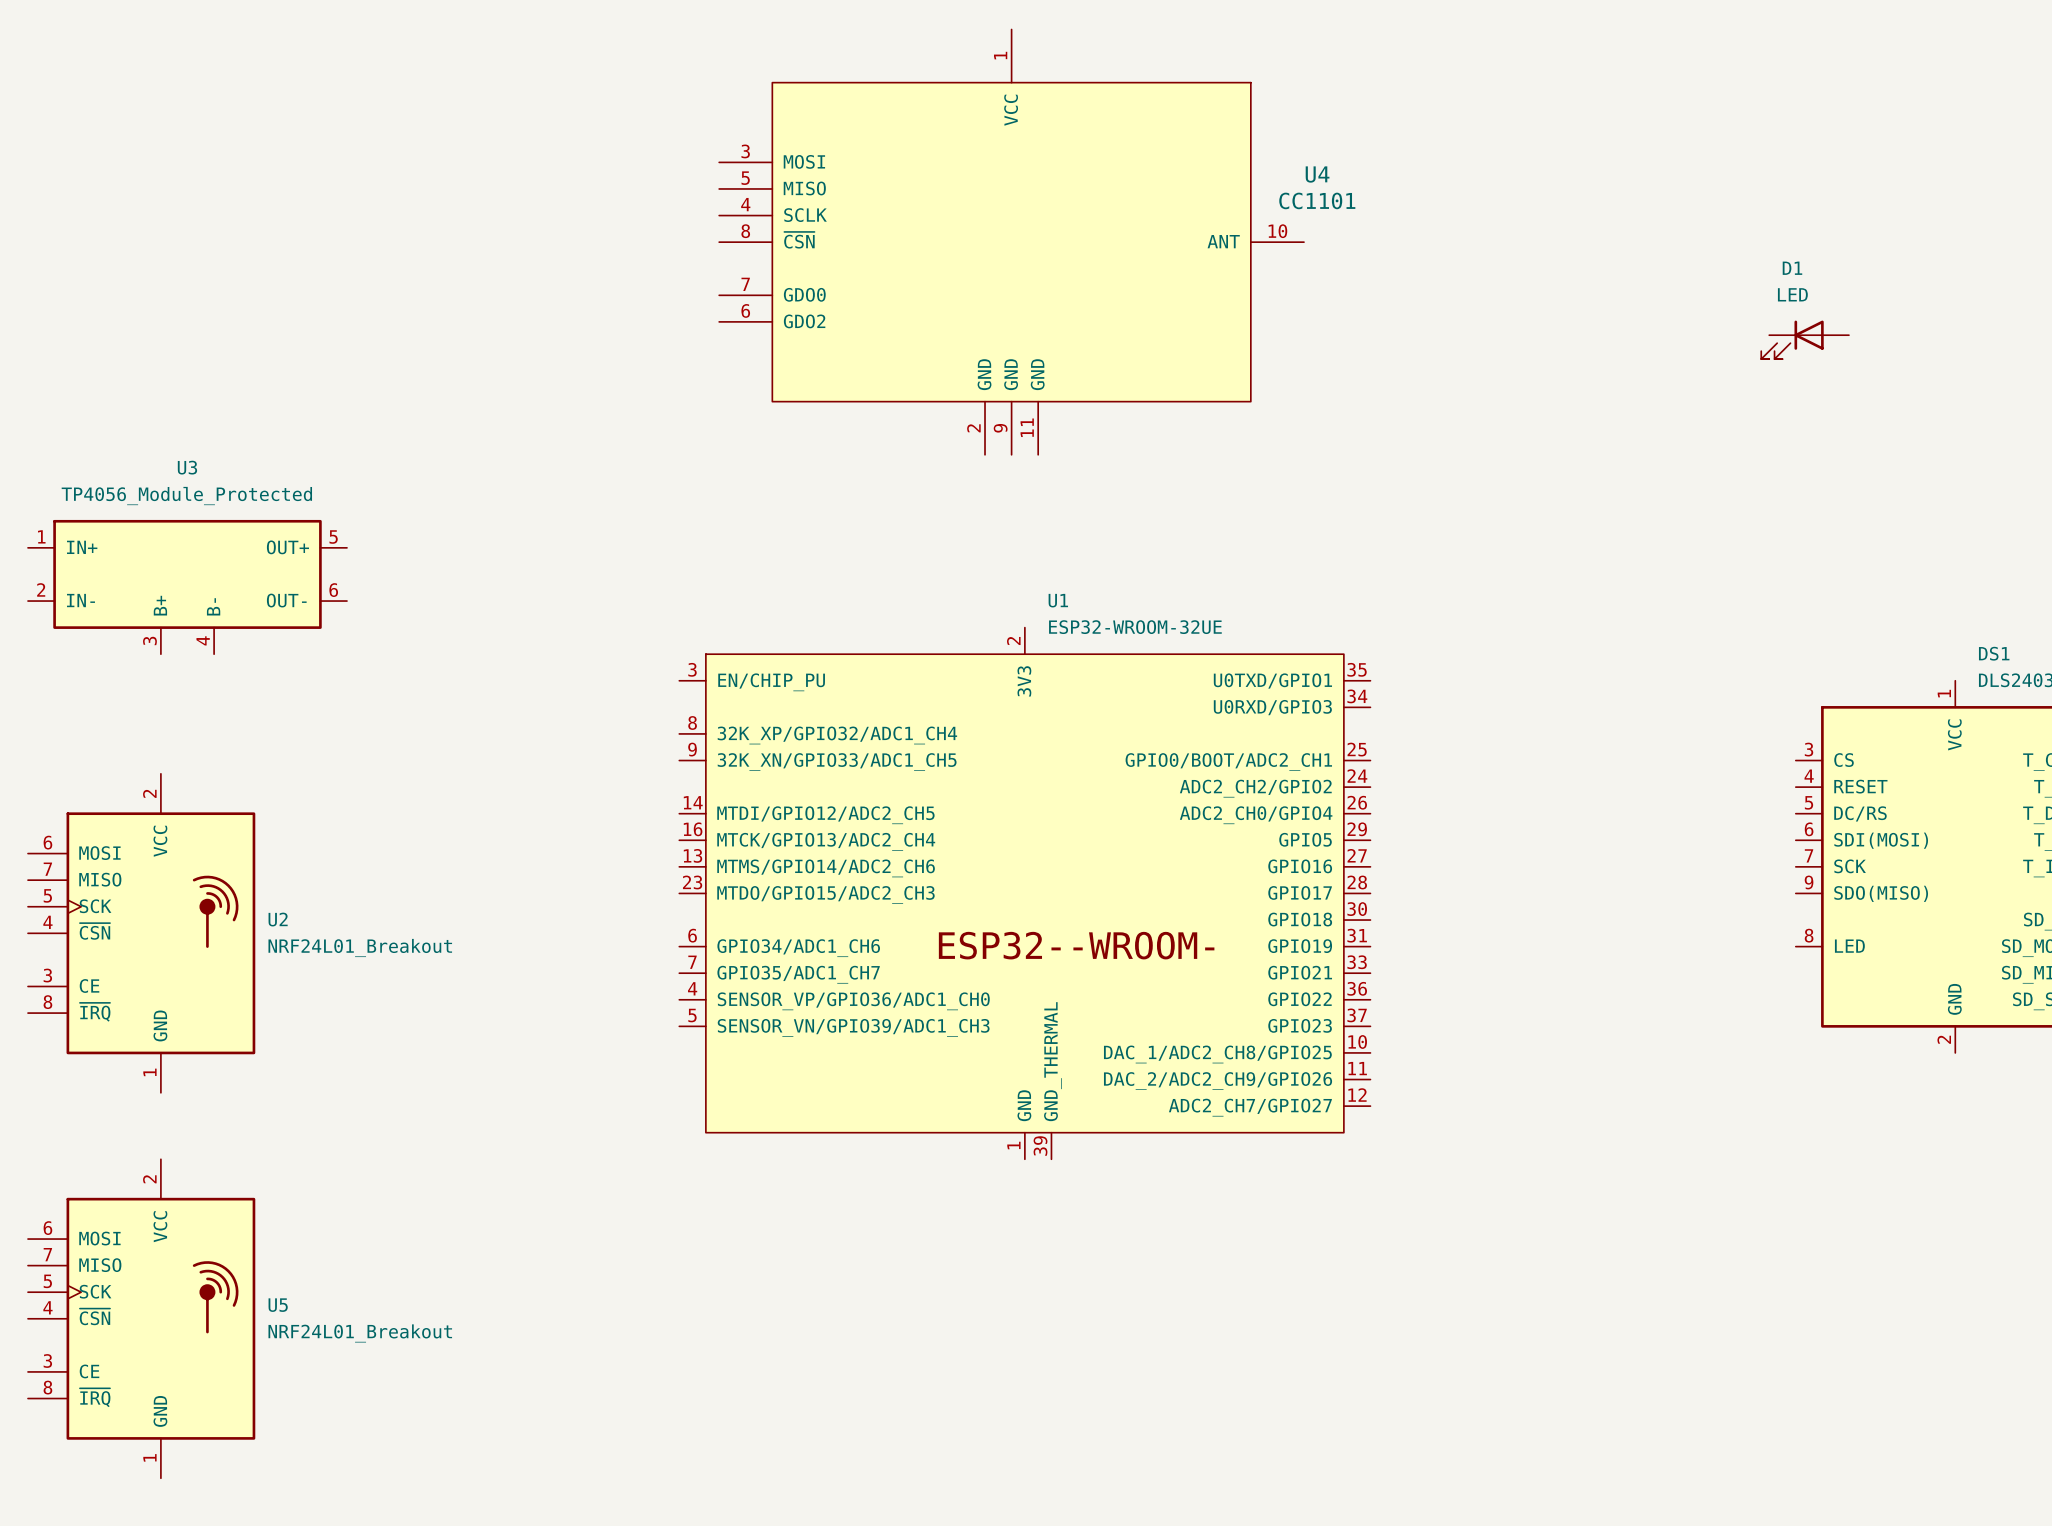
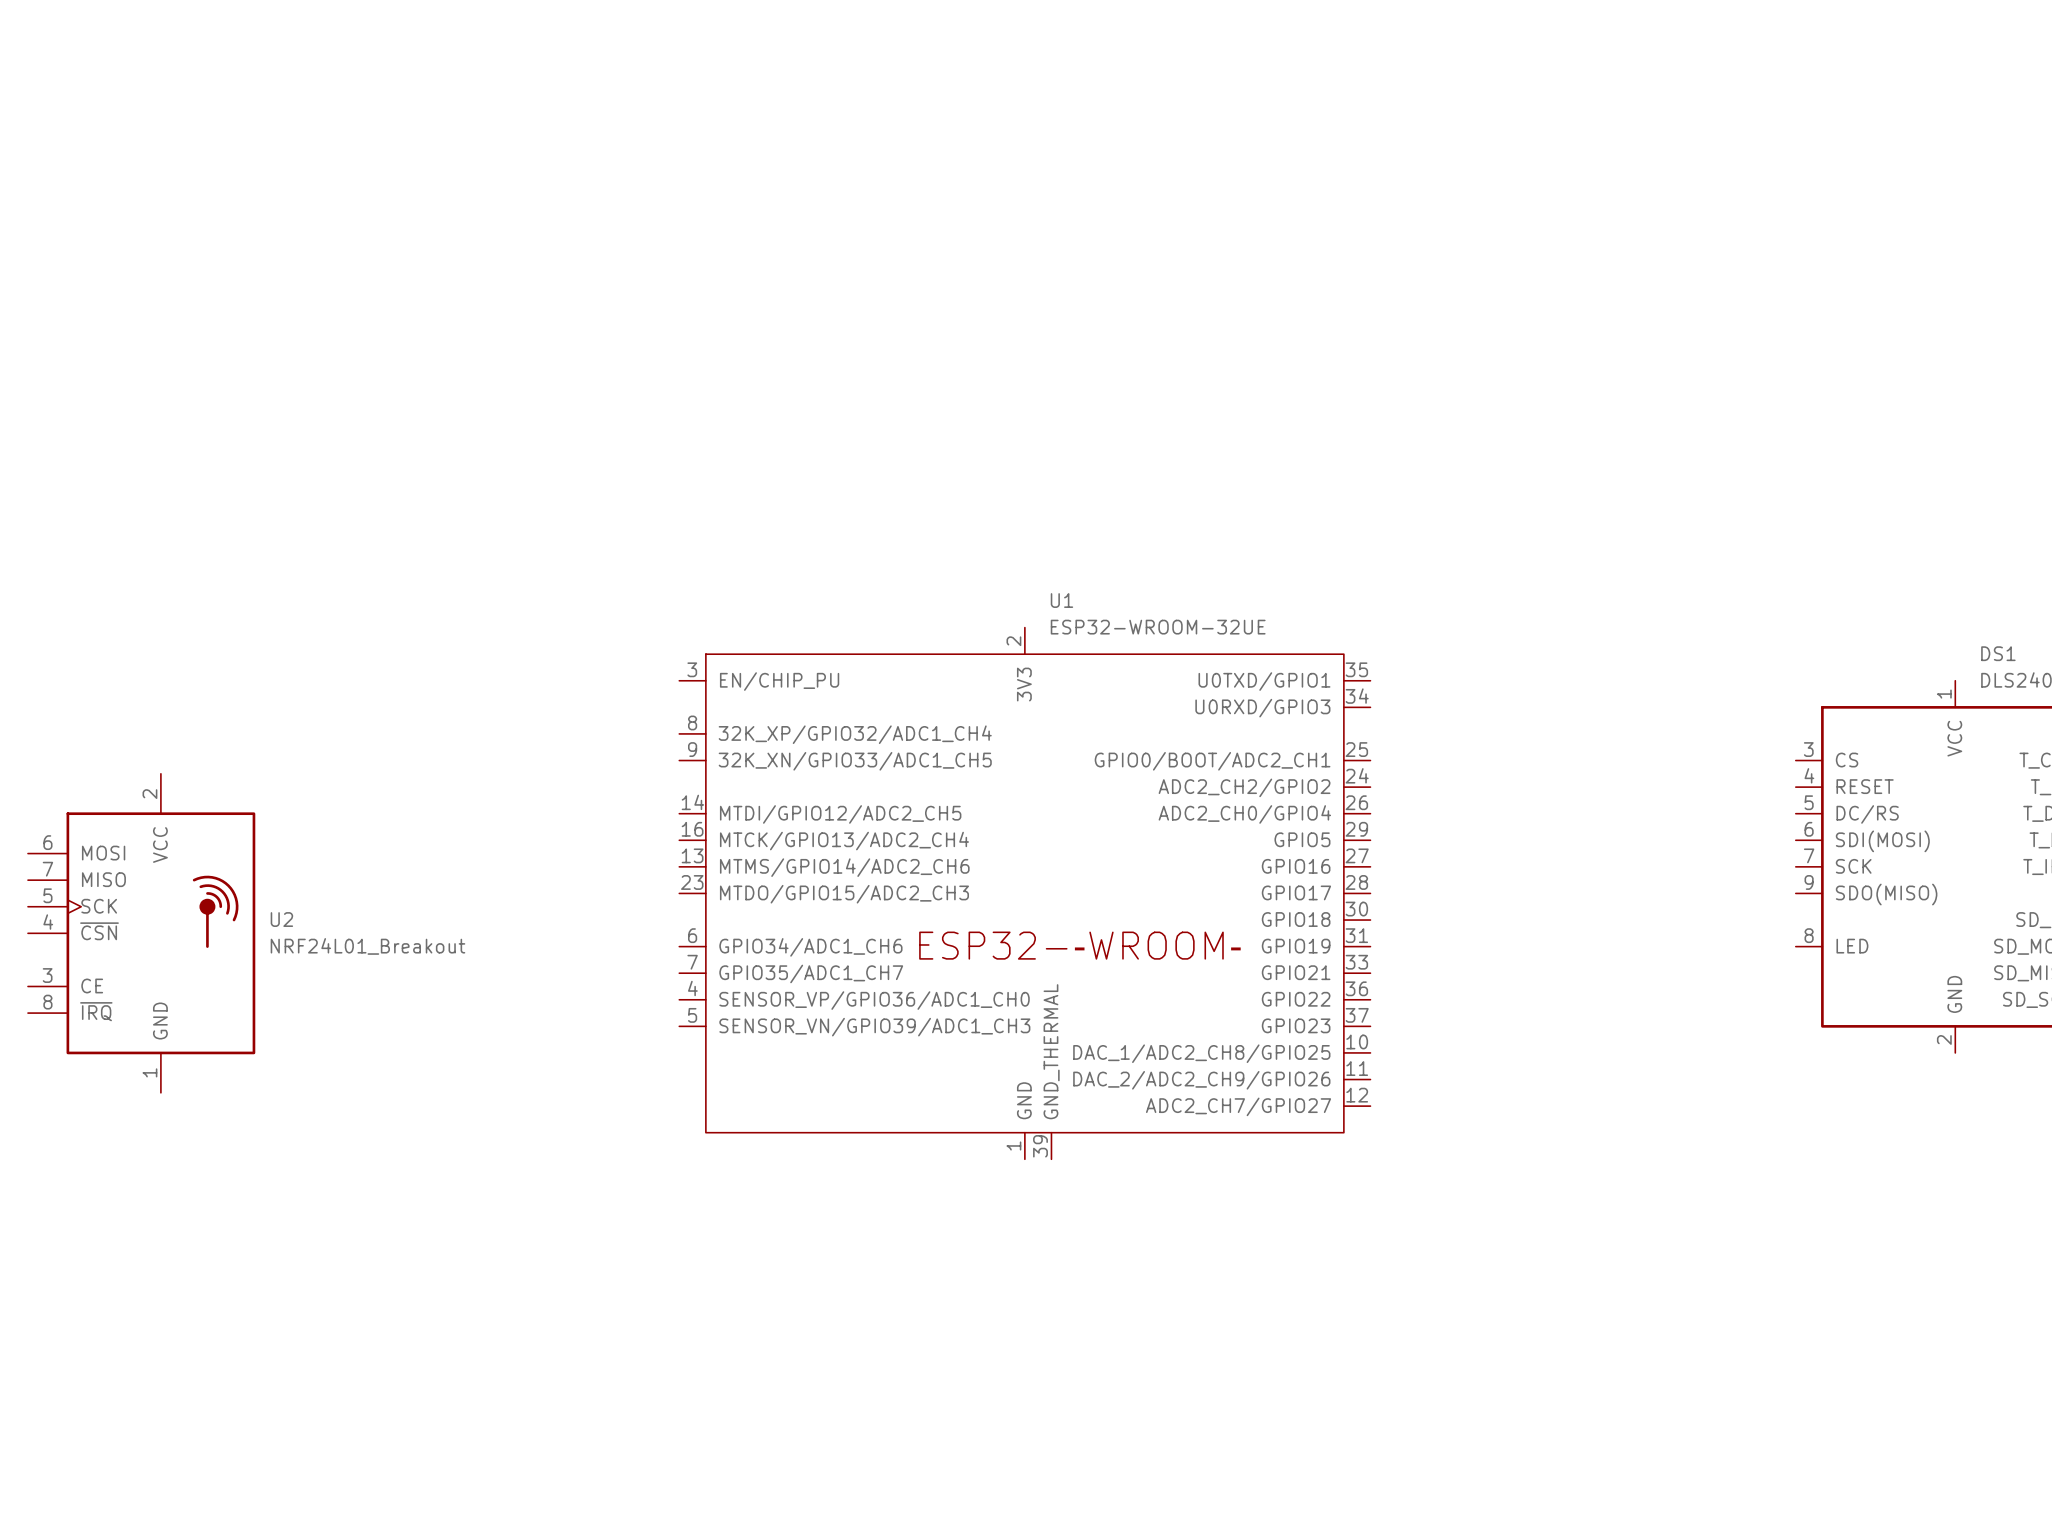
U4: CC1101 (1011, 242) -> none
D1: LED (1805, 339) -> none
U3: TP4056_Module_Protected (187, 587) -> none
U5: NRF24L01_Breakout (141, 1318) -> none

